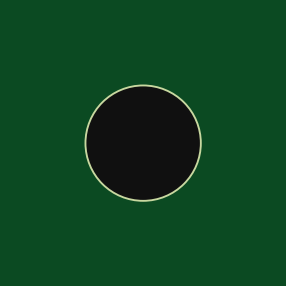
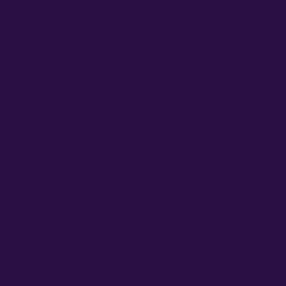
hole: (143, 143) -> none

